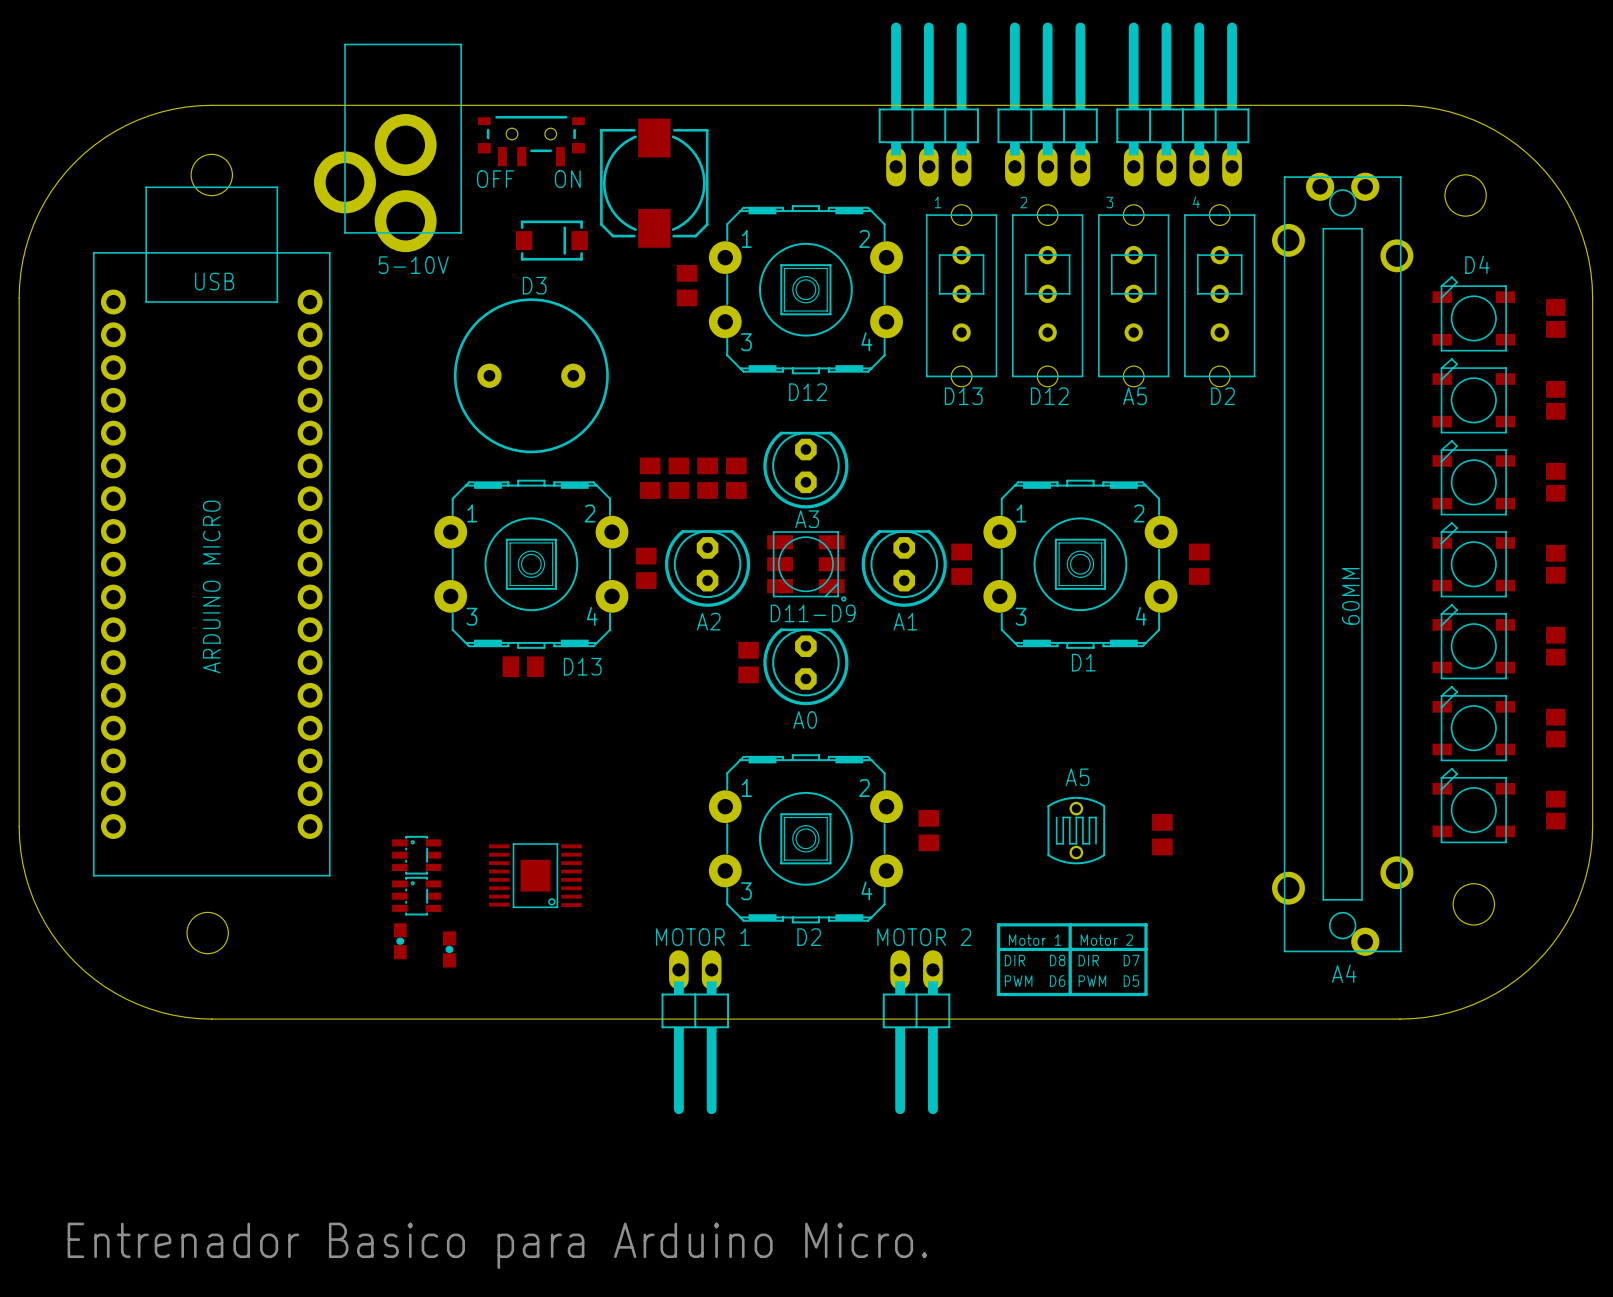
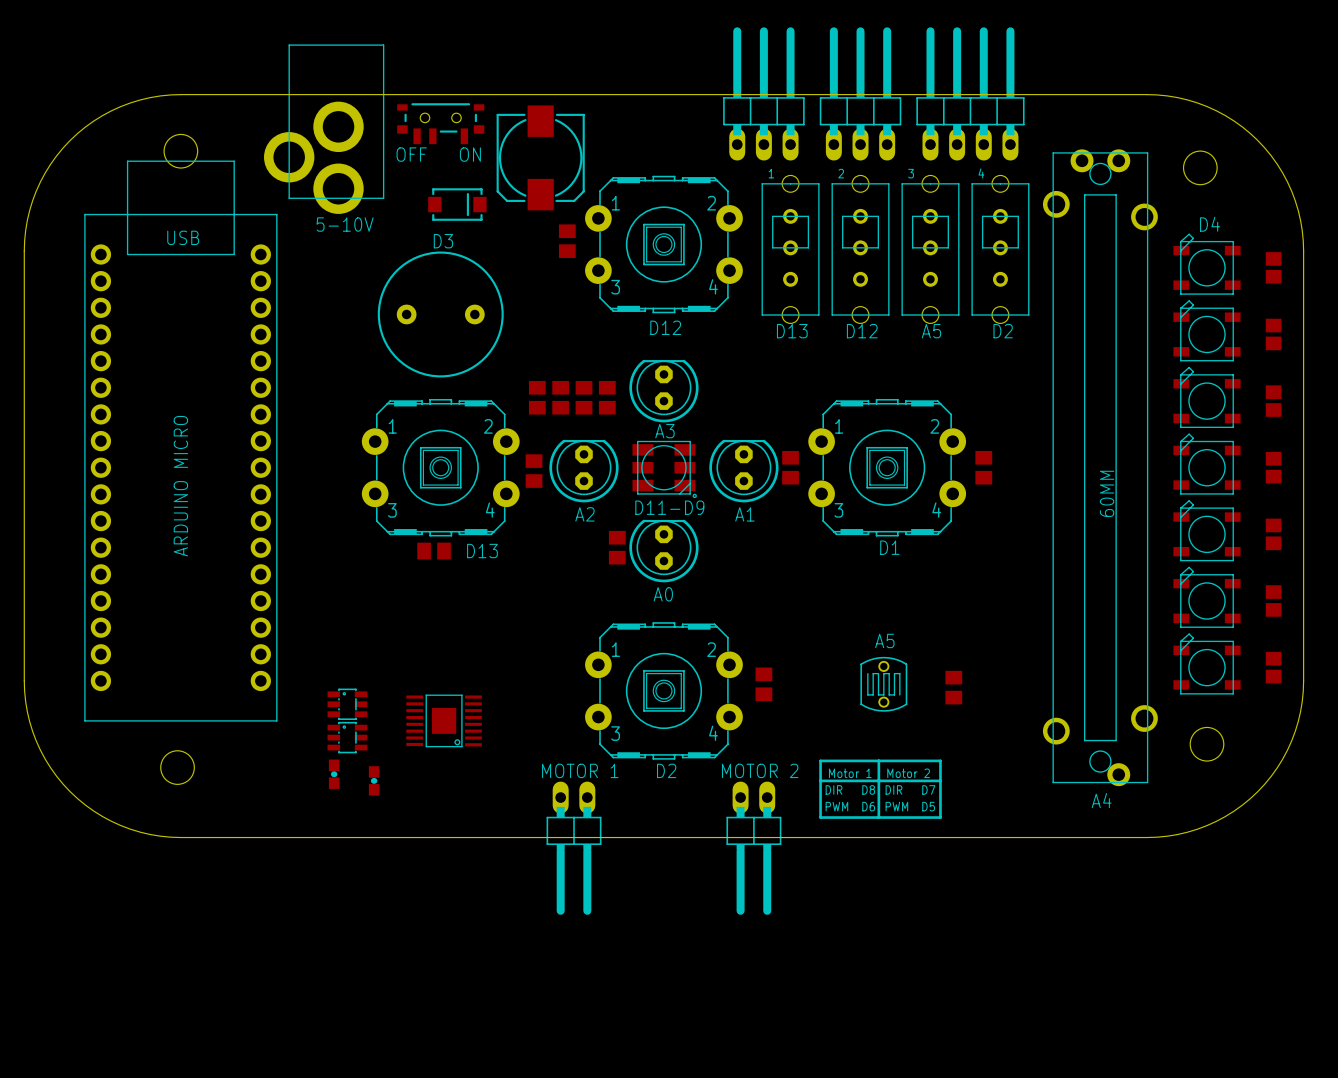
text: Entrenador Basico para Arduino Micro. (497, 1245) -> none

